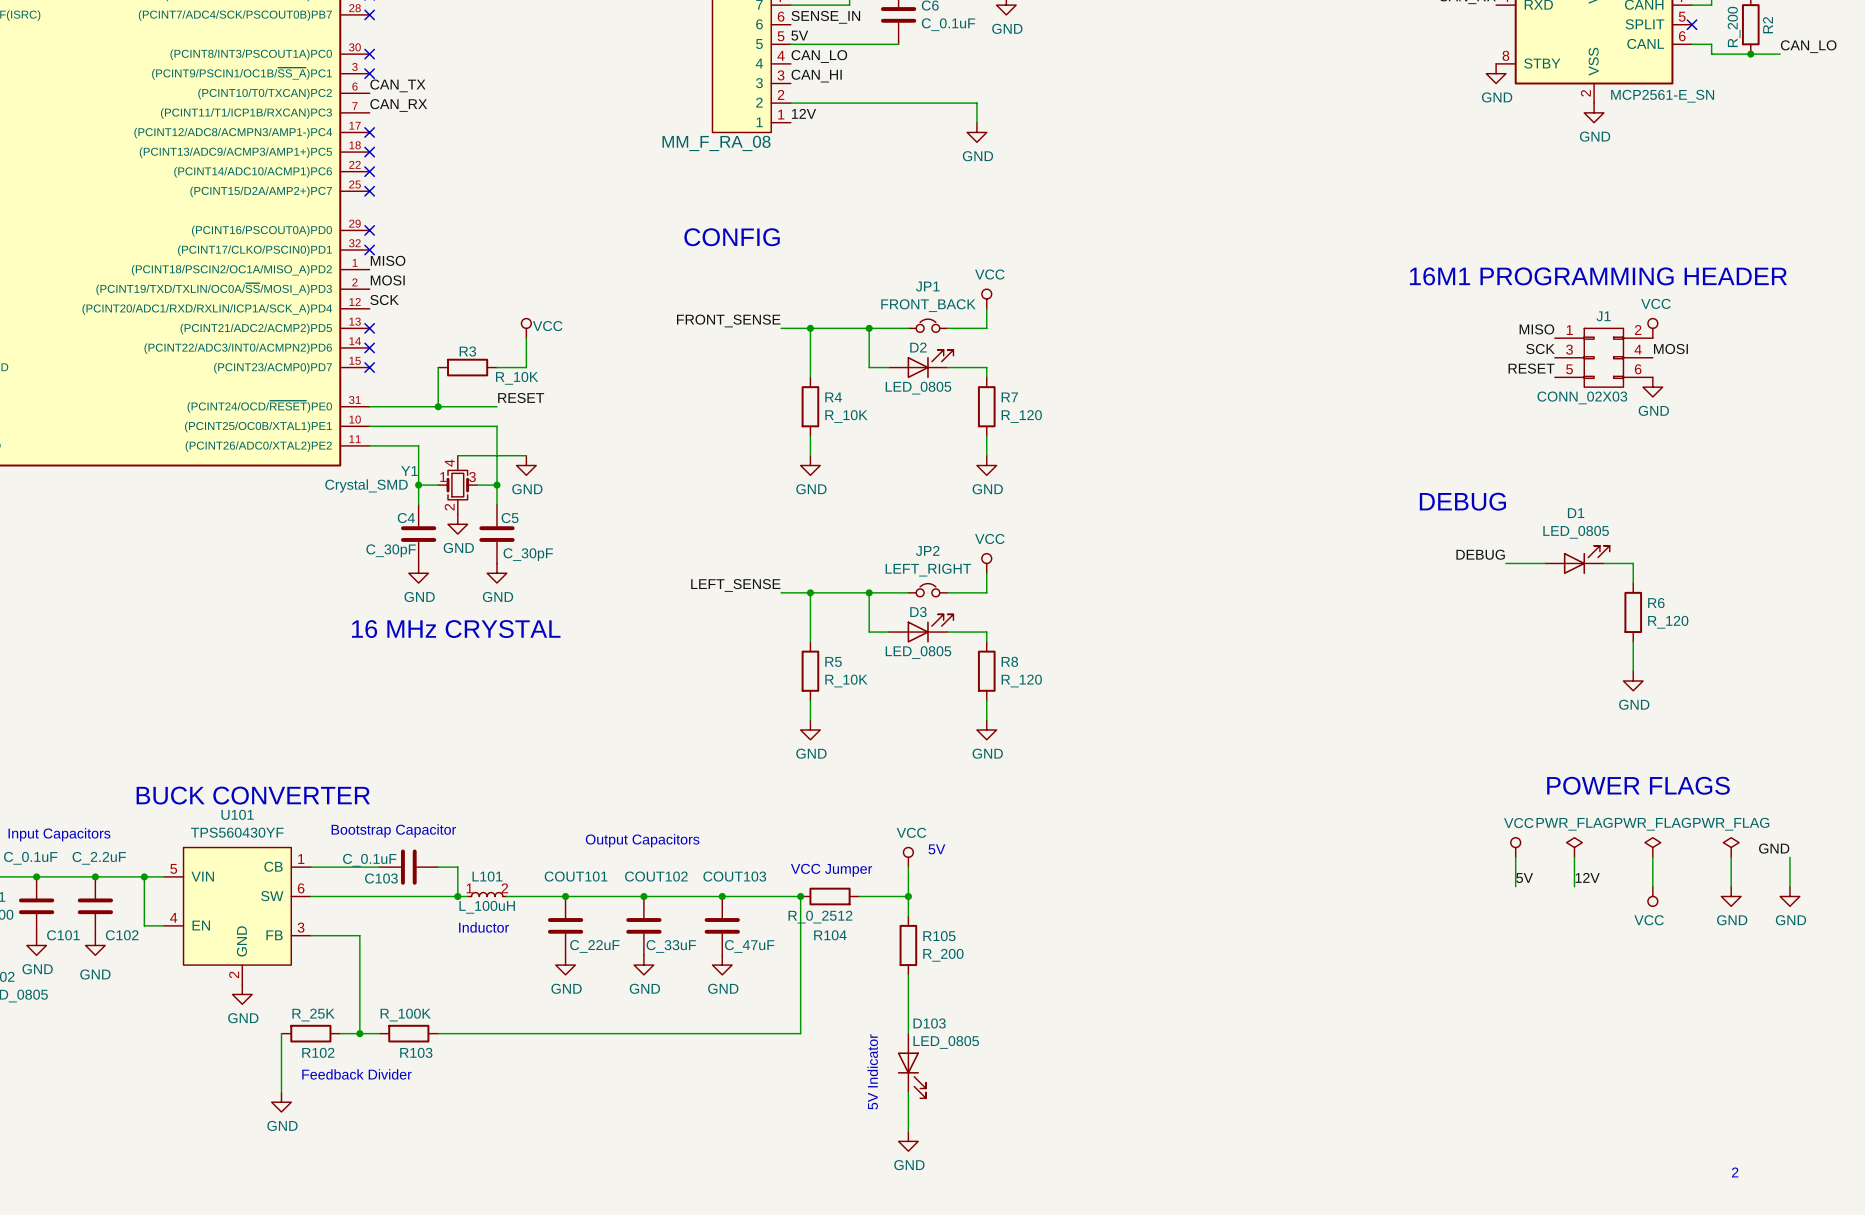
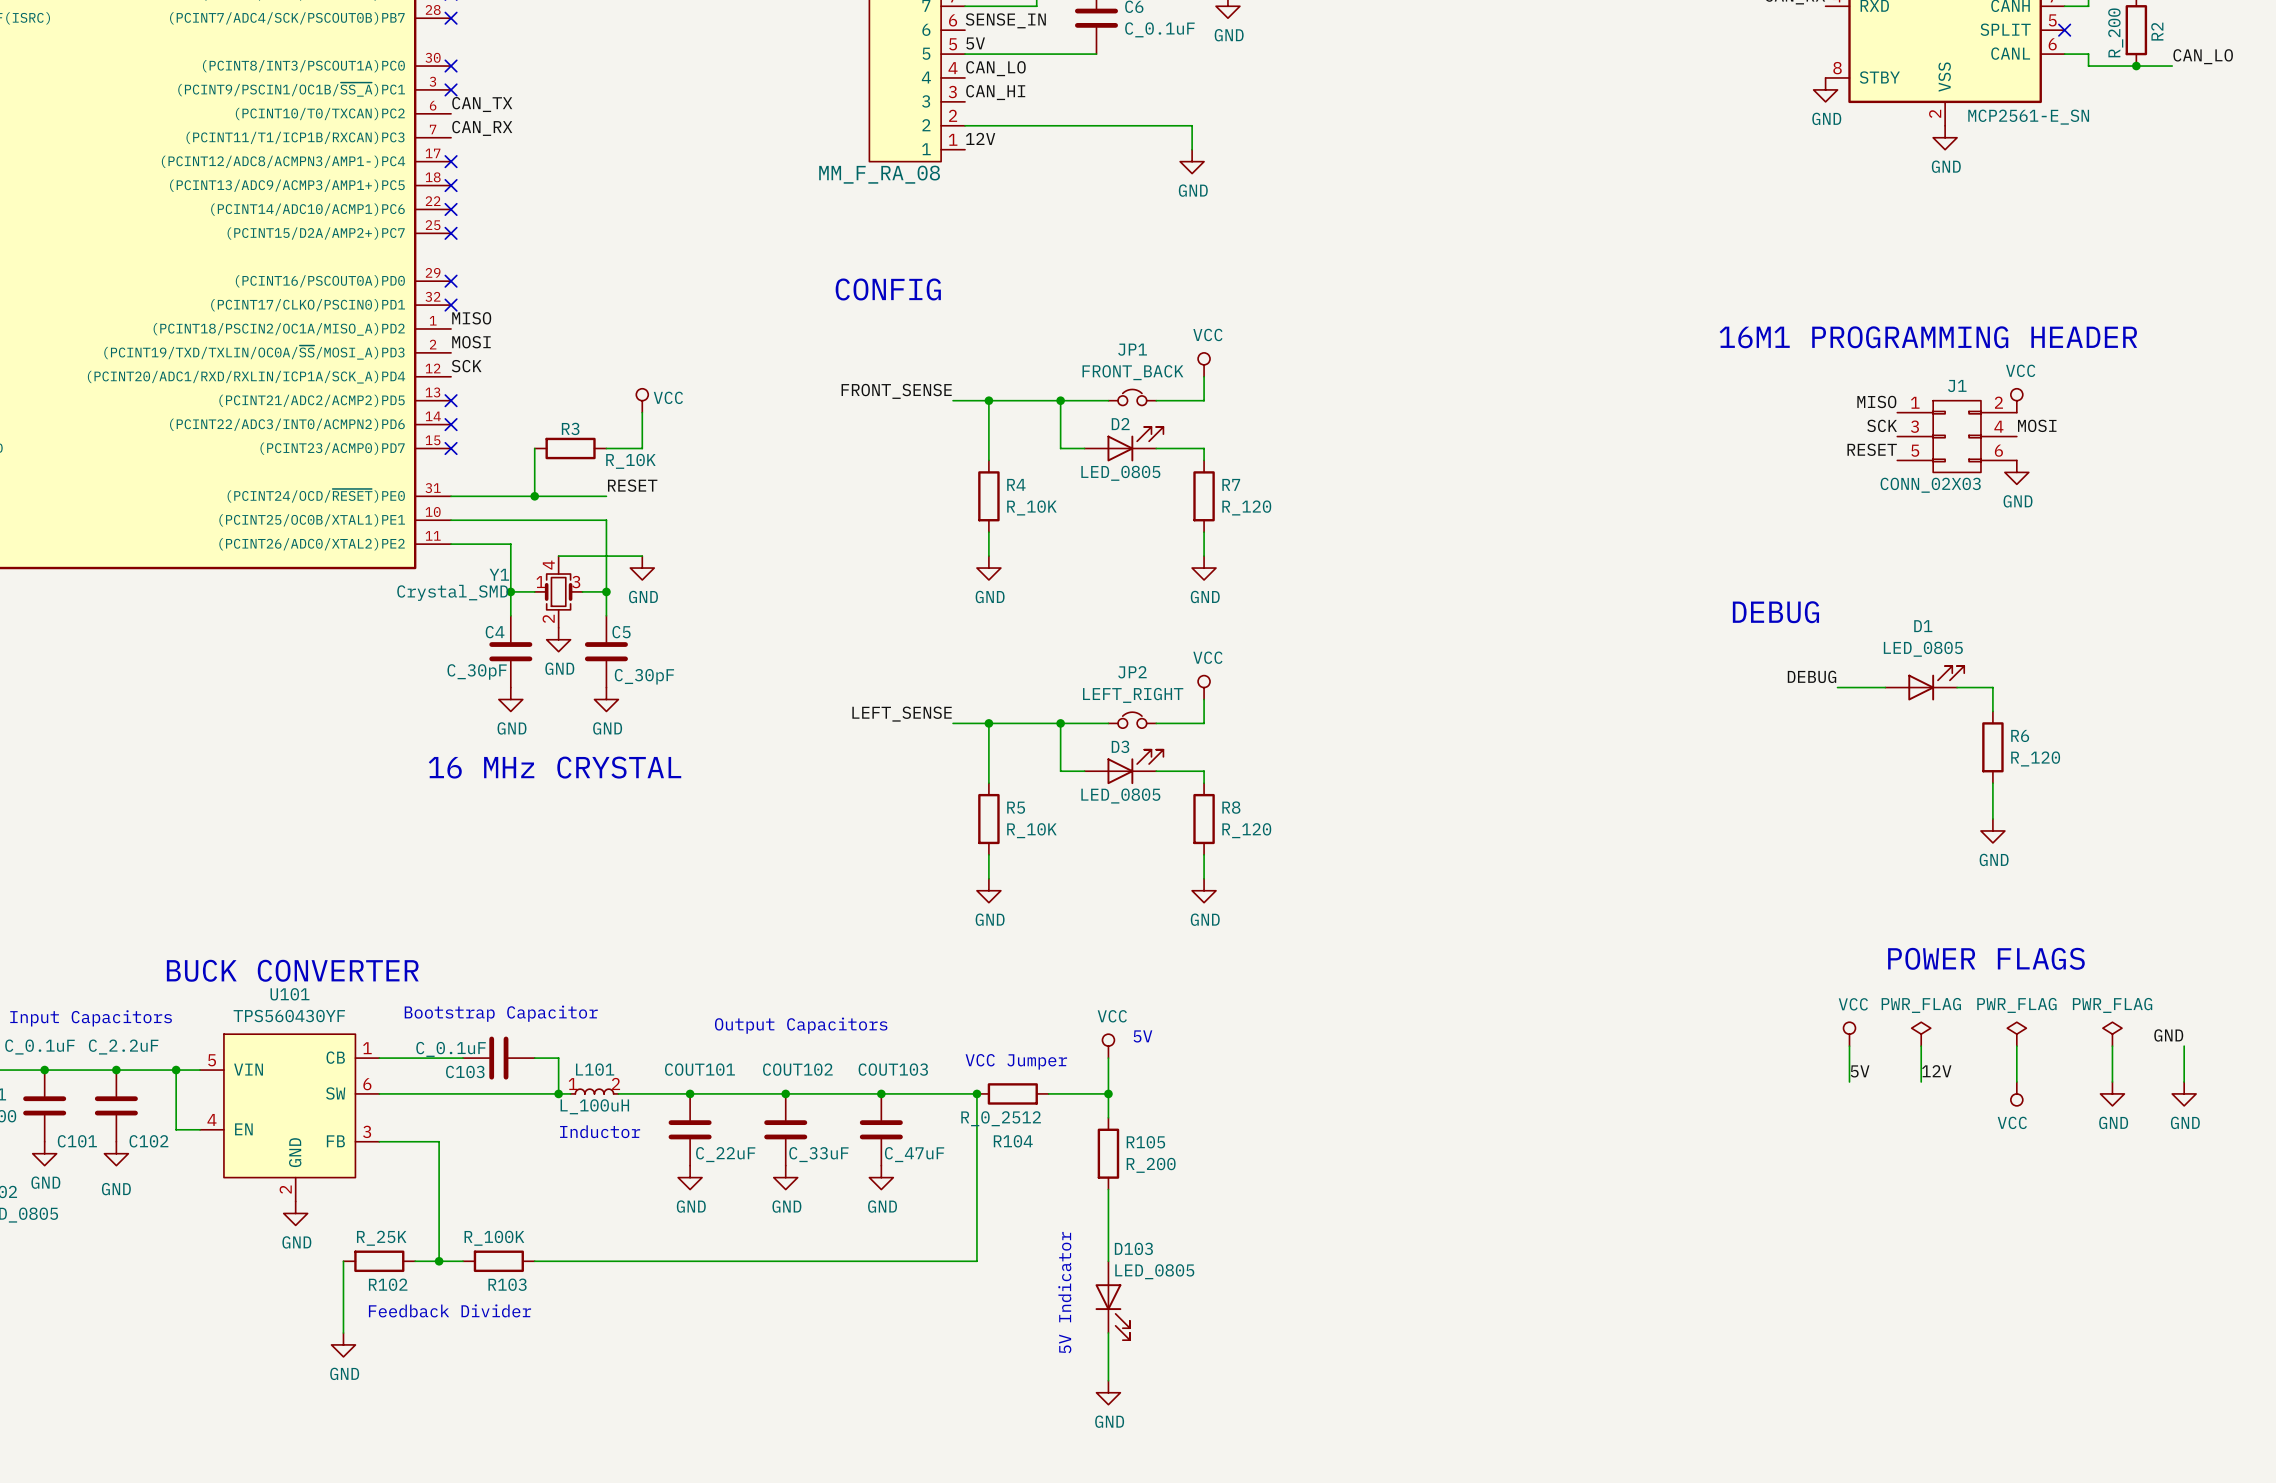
text: 2 (1735, 1172) -> none

